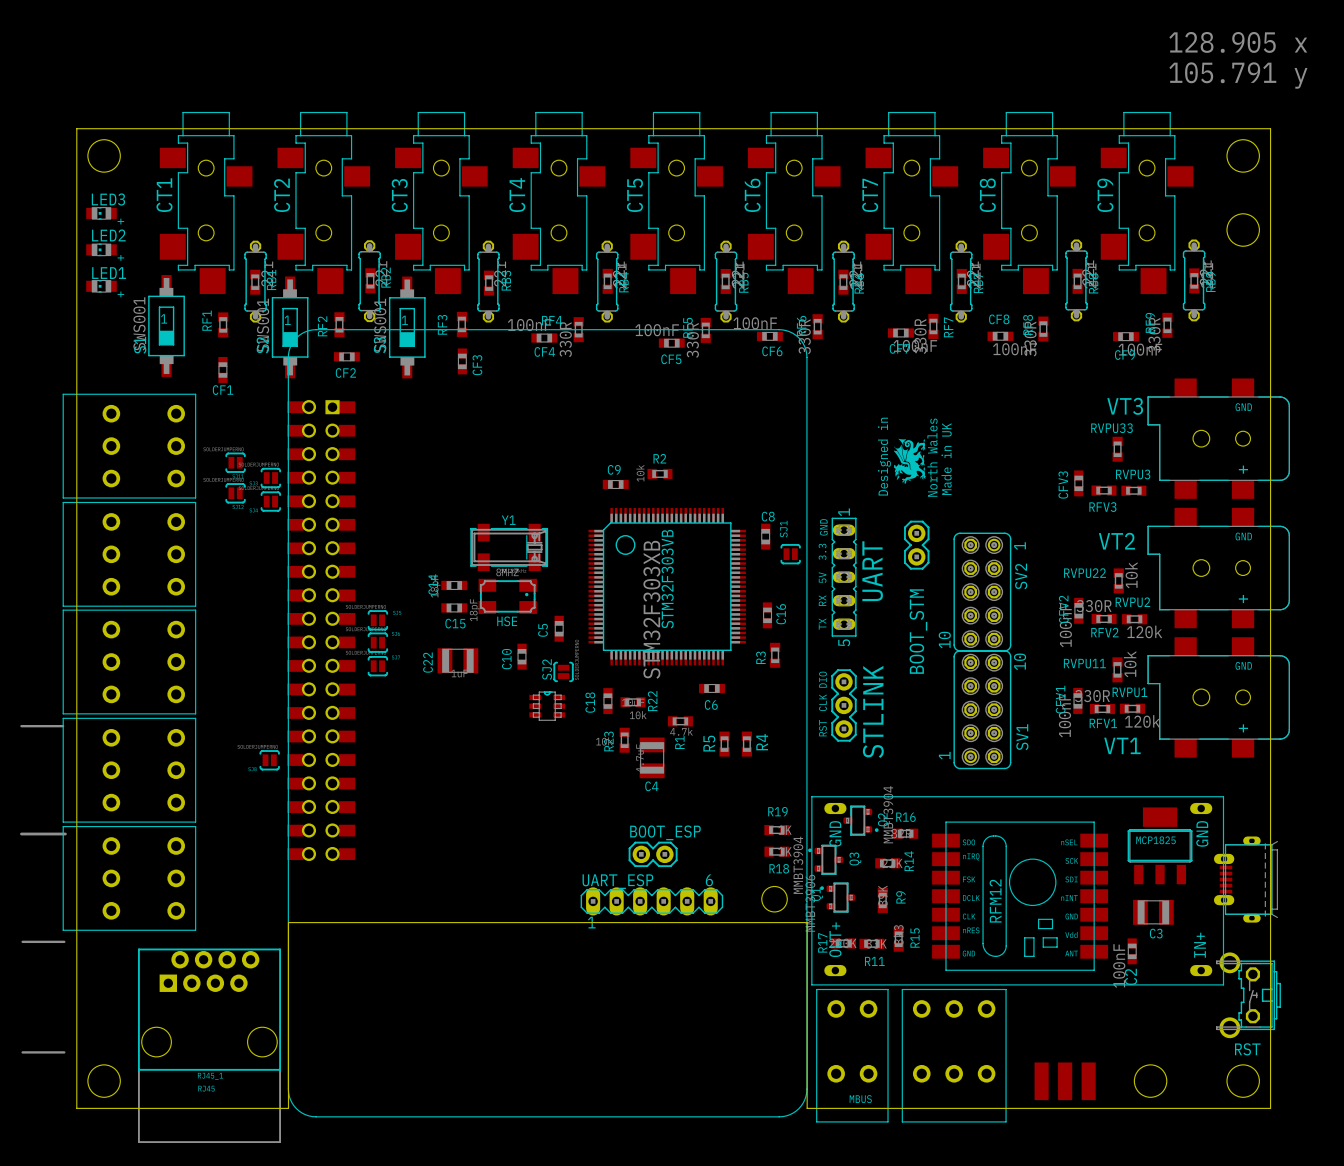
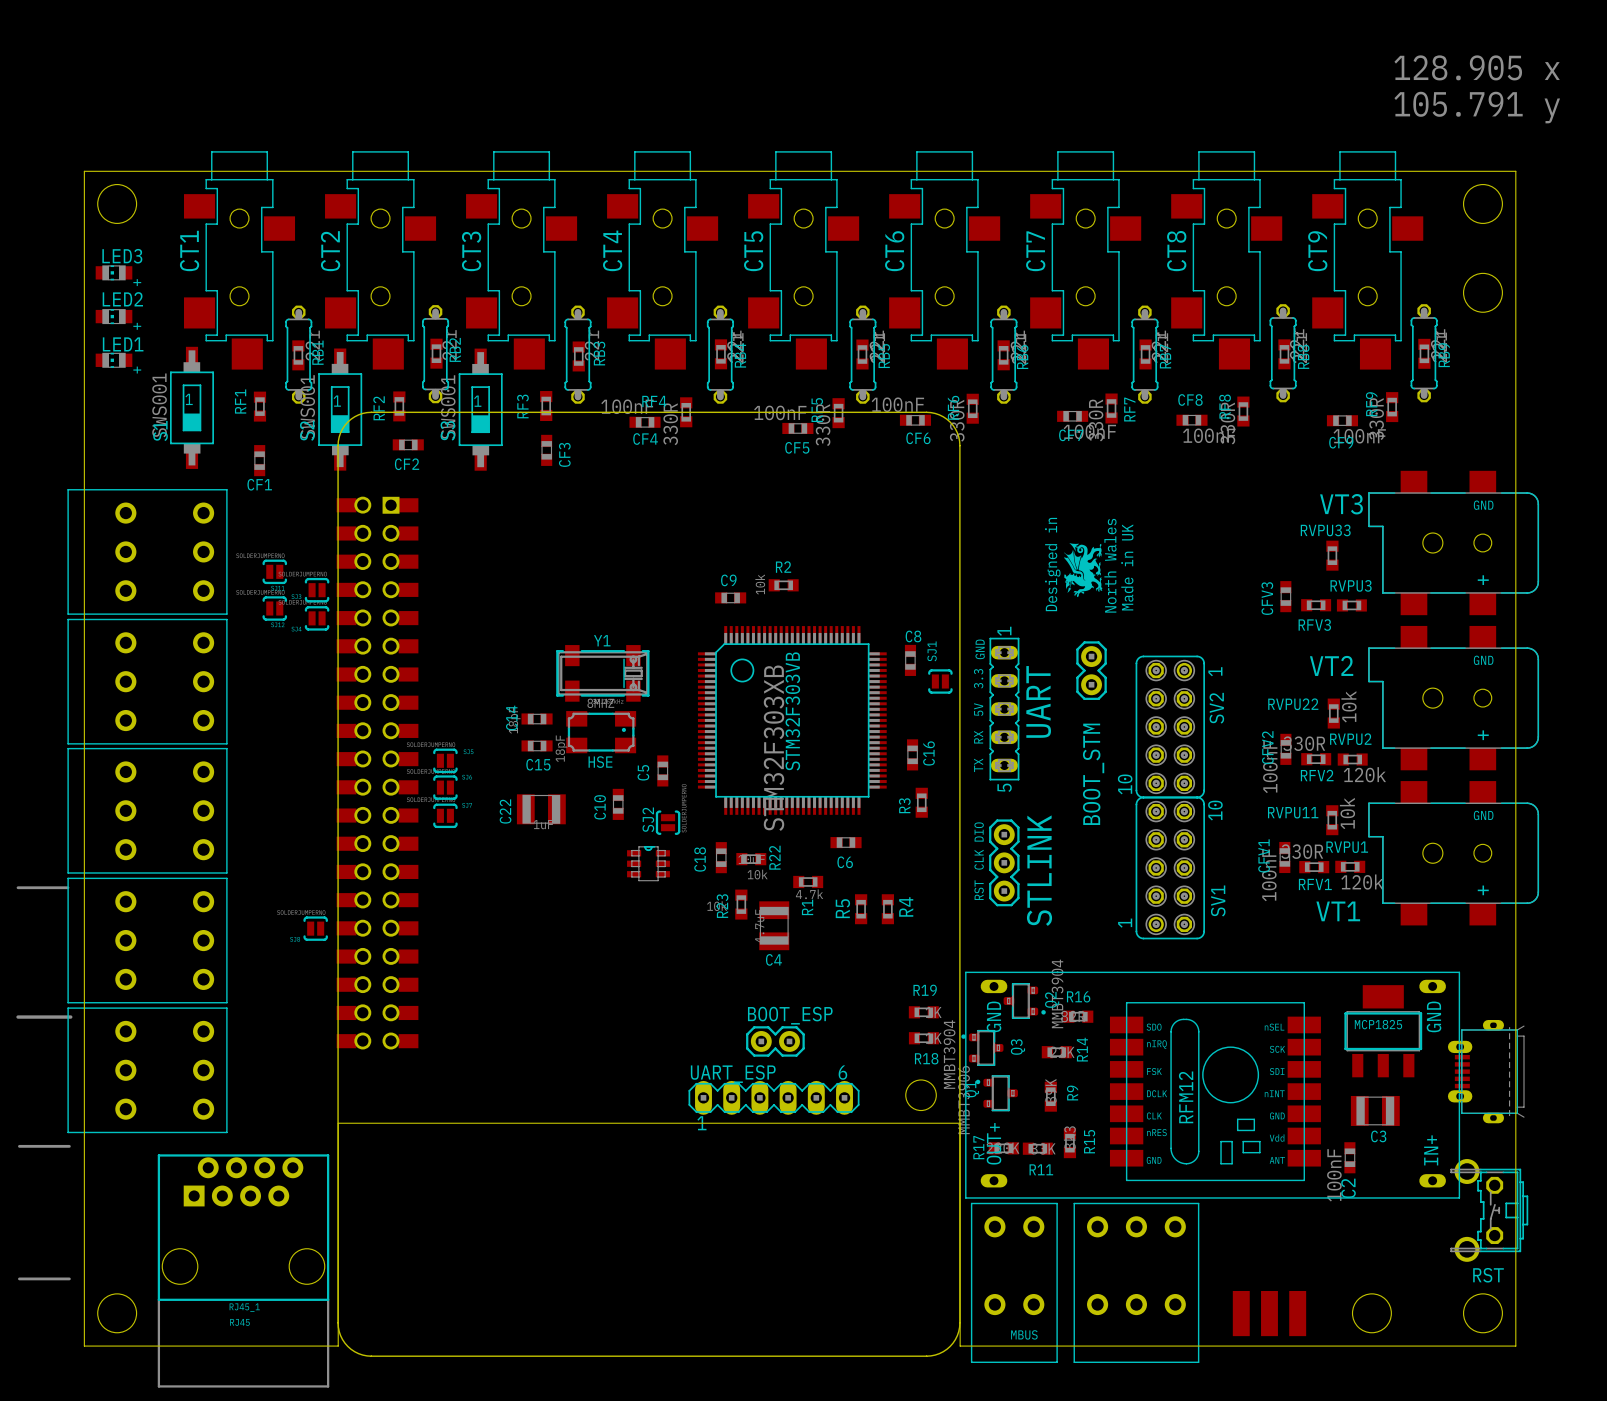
part footprint: [287, 329, 808, 1118] -> [336, 411, 961, 1357]

